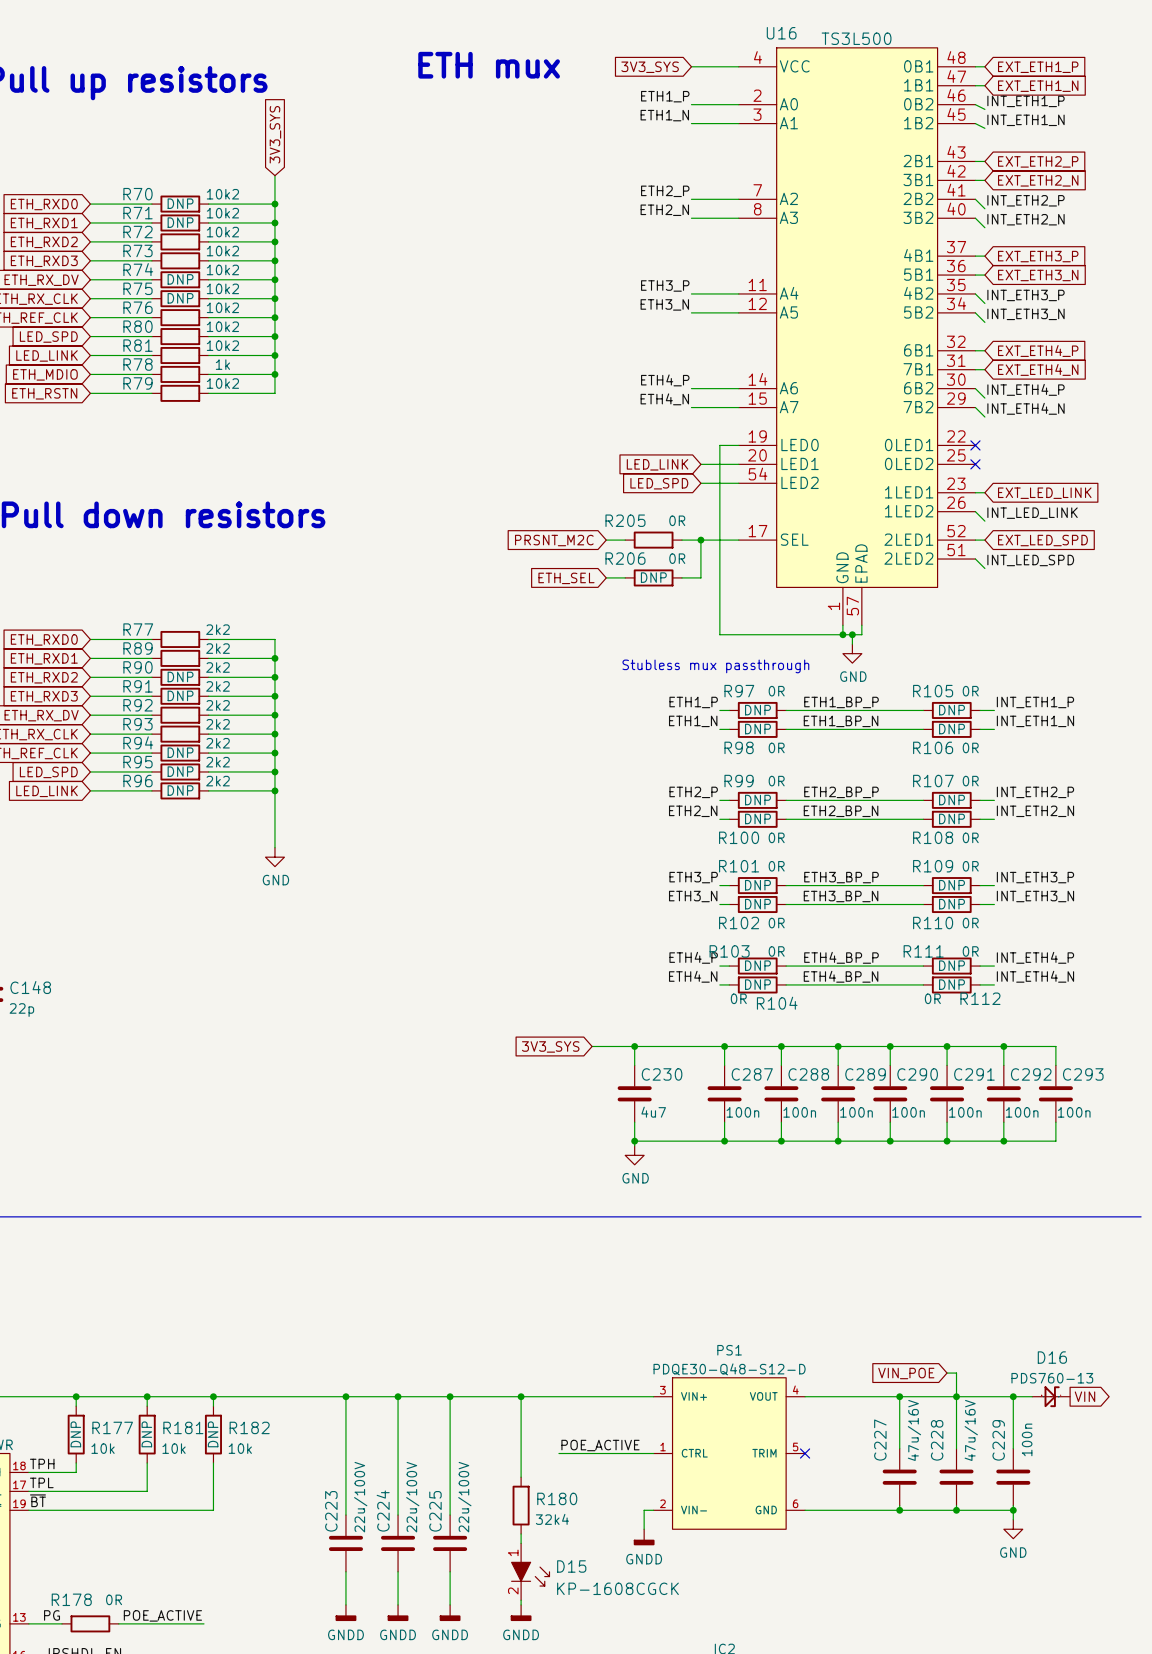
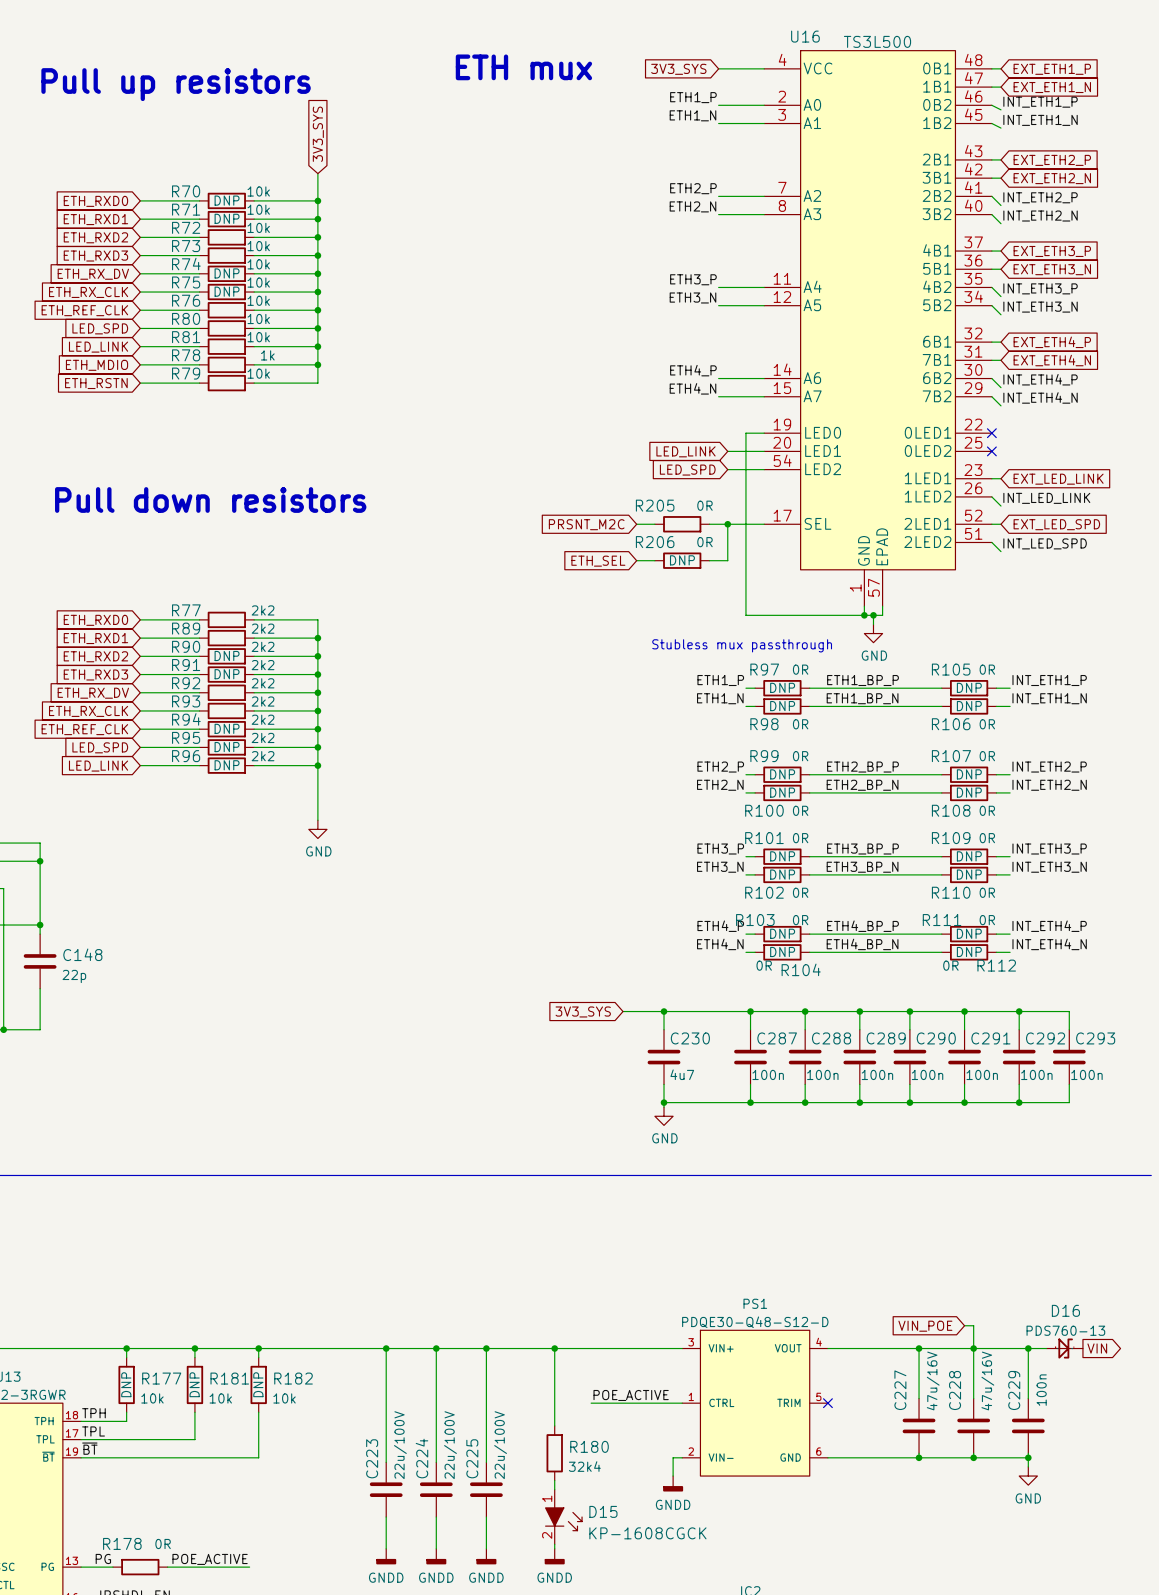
R70 text: 10k2 (222, 194) -> 10k (258, 191)
R71 text: 10k2 (222, 213) -> 10k (258, 209)
R72 text: 10k2 (222, 232) -> 10k (258, 227)
R73 text: 10k2 (222, 251) -> 10k (258, 246)
R74 text: 10k2 (222, 269) -> 10k (258, 264)
R75 text: 10k2 (222, 288) -> 10k (258, 282)
R76 text: 10k2 (222, 307) -> 10k (258, 300)
R80 text: 10k2 (222, 326) -> 10k (258, 319)
R81 text: 10k2 (222, 345) -> 10k (258, 337)
R79 text: 10k2 (222, 383) -> 10k (258, 373)

